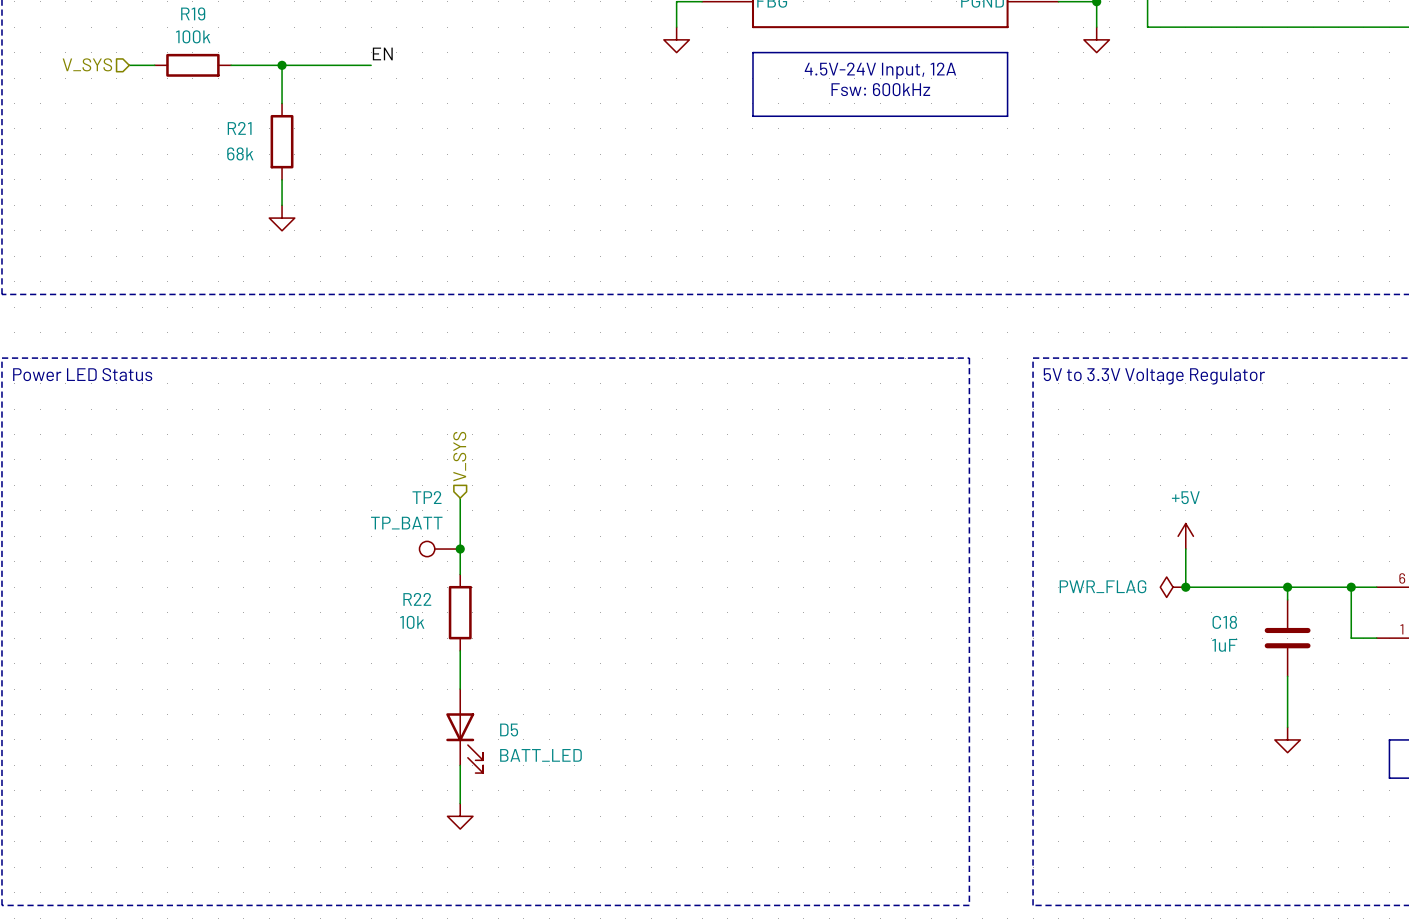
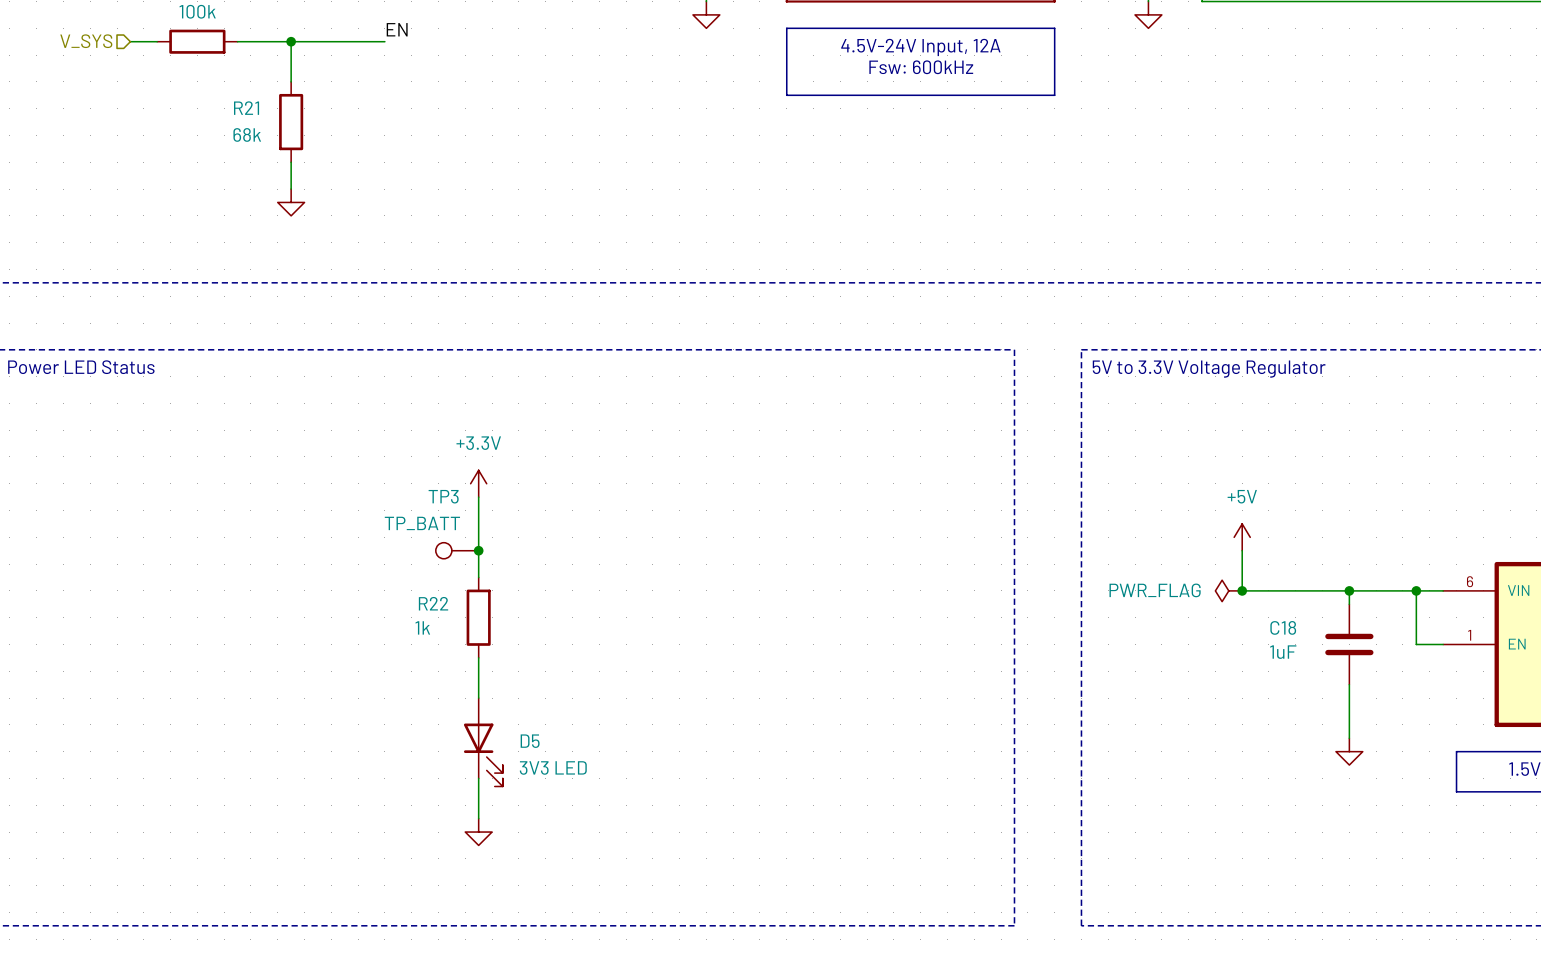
hierarchical label: V_SYS (459, 456) -> none
power symbol: none -> +3.3V (478, 483)
TP2 name: TP2 (427, 497) -> TP3 (443, 496)
R22 value: 10k (412, 622) -> 1k (422, 627)
D5 value: BATT_LED (540, 755) -> 3V3 LED (553, 767)

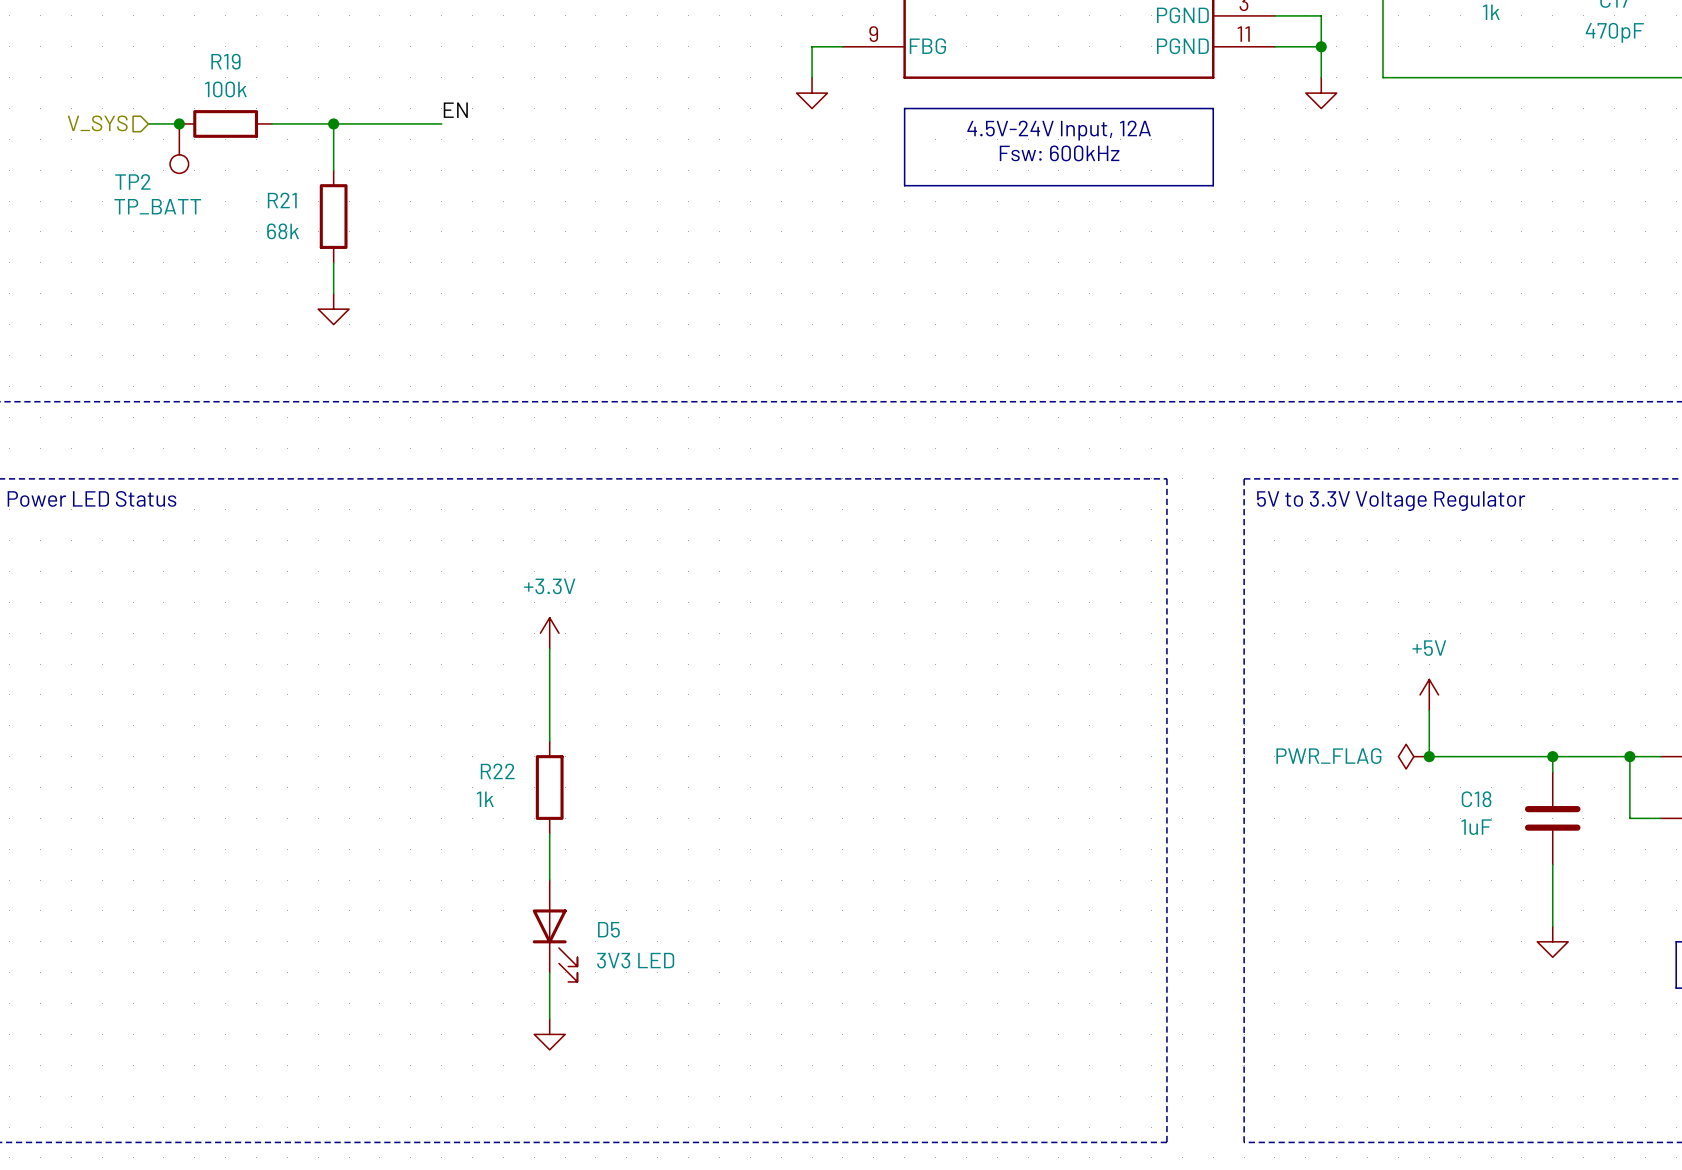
junction: none -> (179, 123)
TP2: none -> TP_BATT (179, 148)
TP3: TP_BATT (457, 550) -> none
junction: (478, 550) -> none

